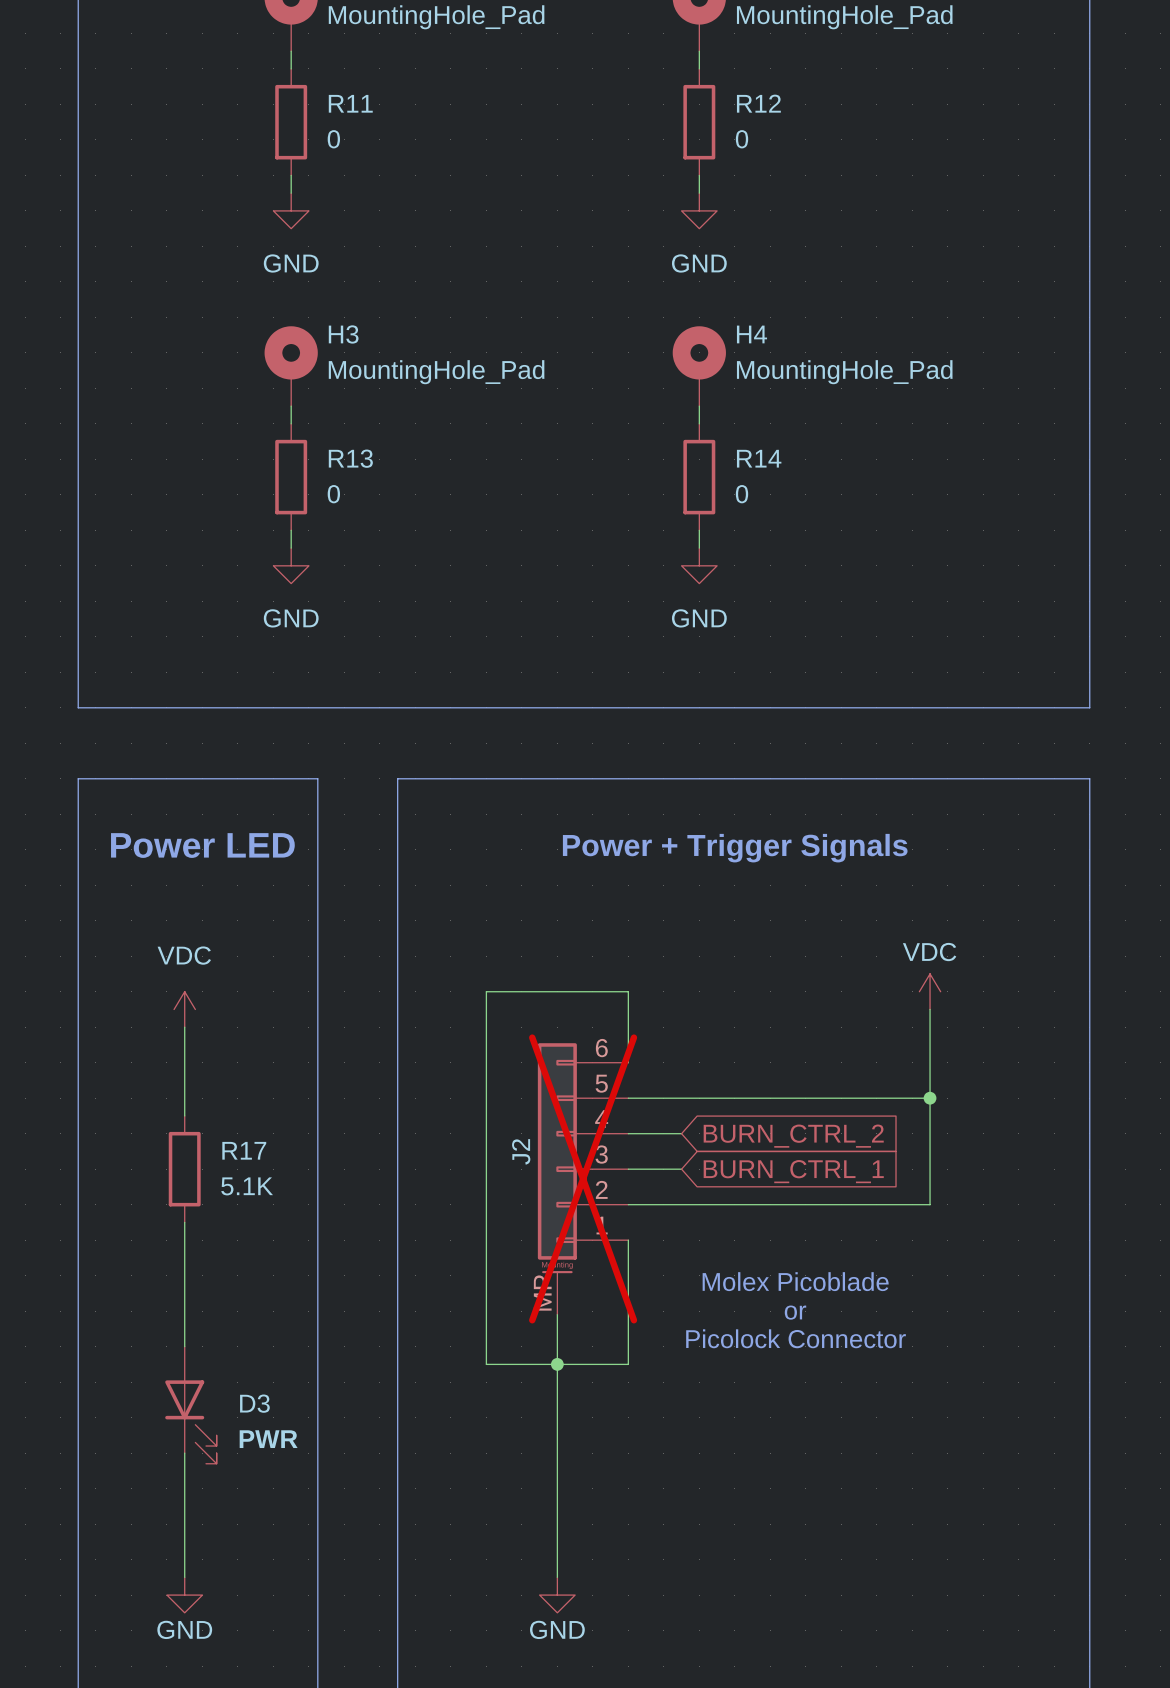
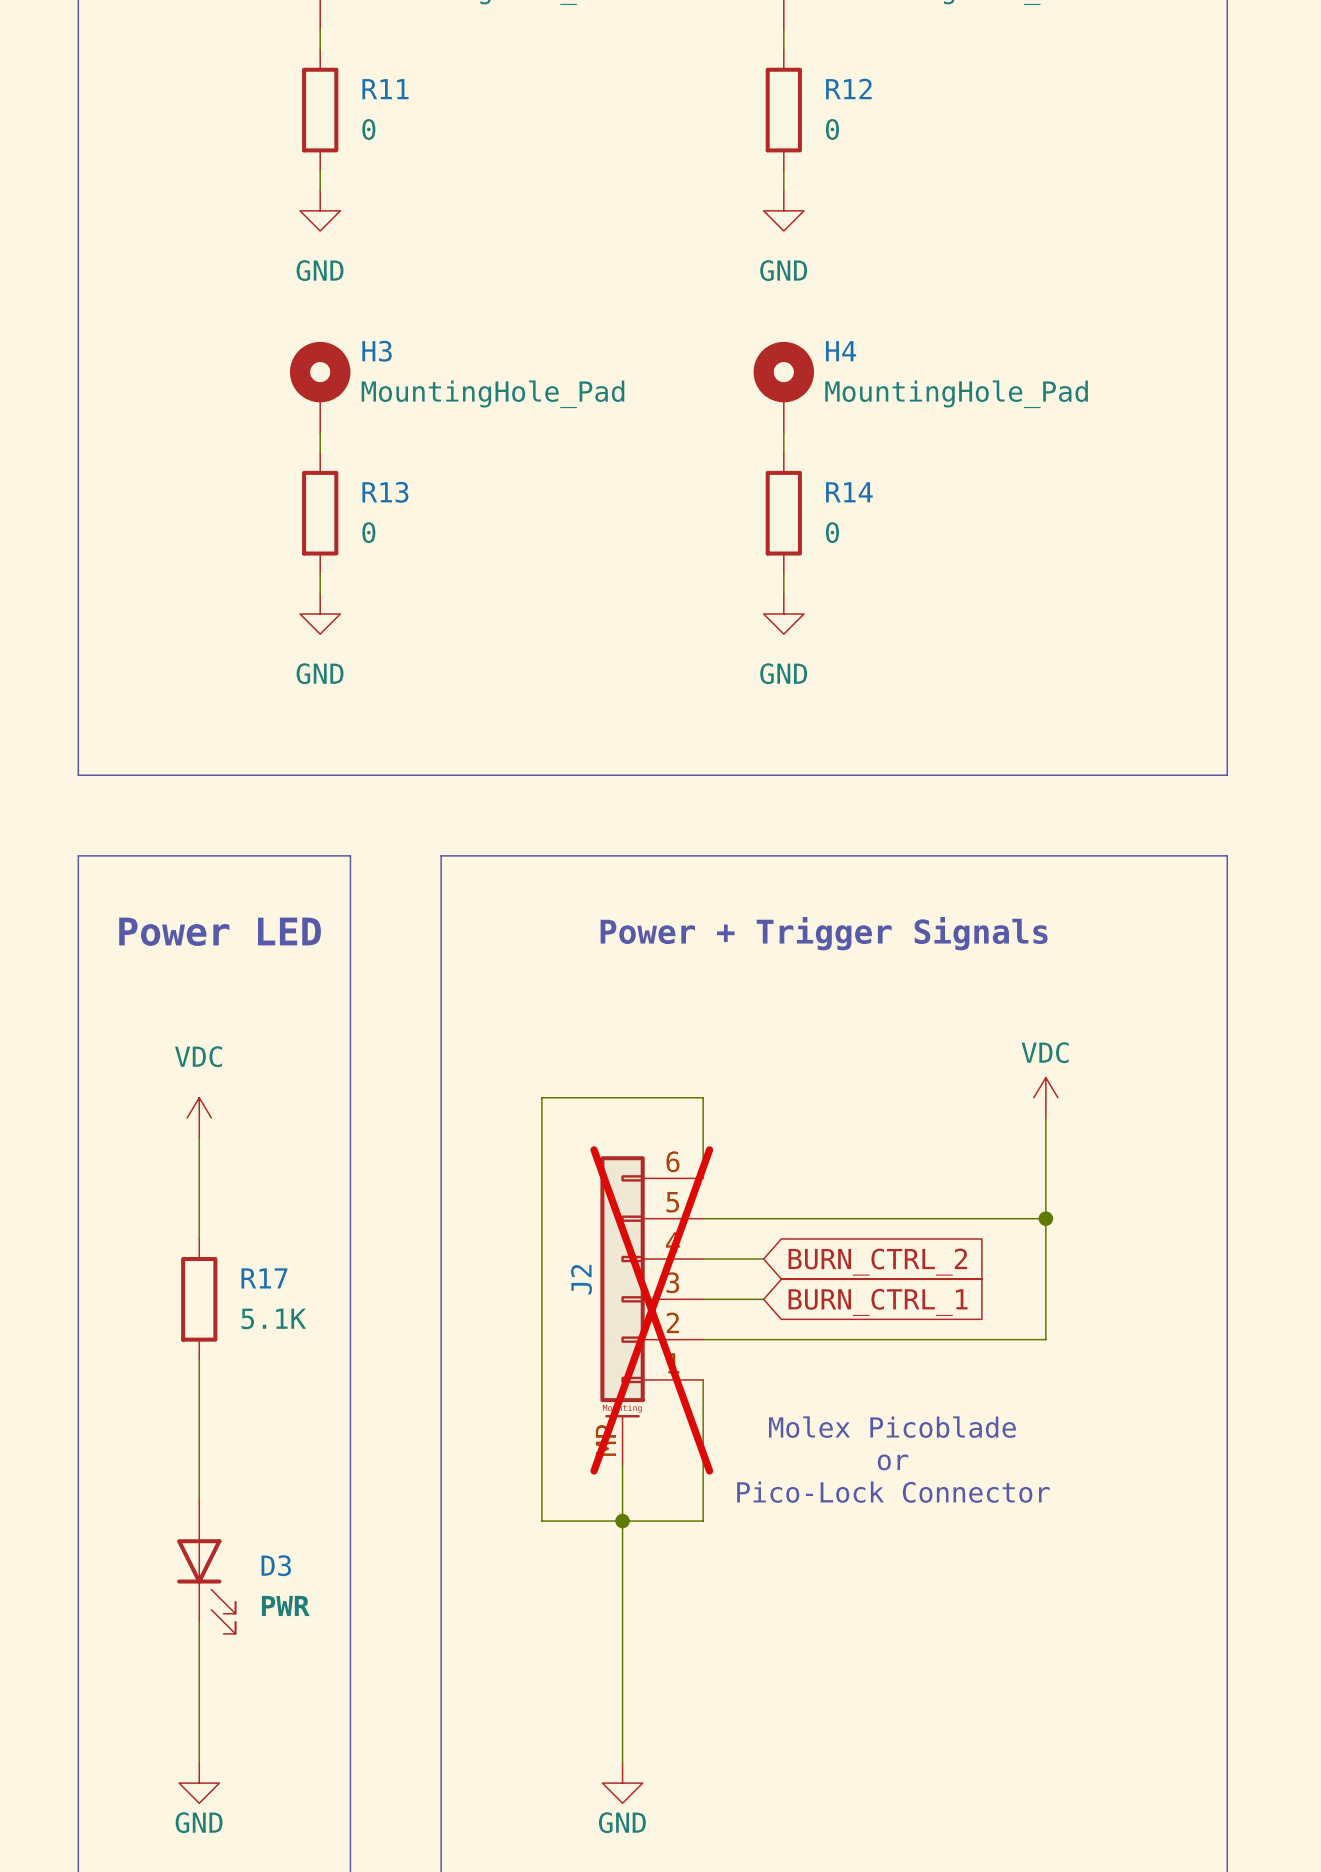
text: Picolock Connector (796, 1338) -> Pico-Lock Connector (893, 1492)

